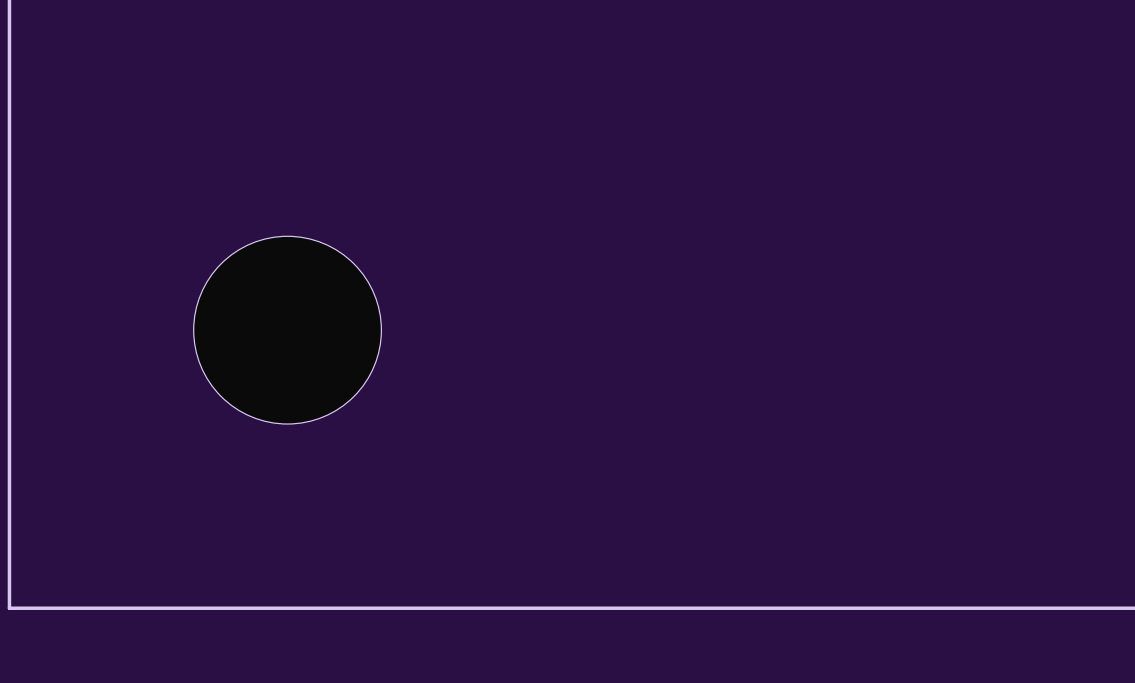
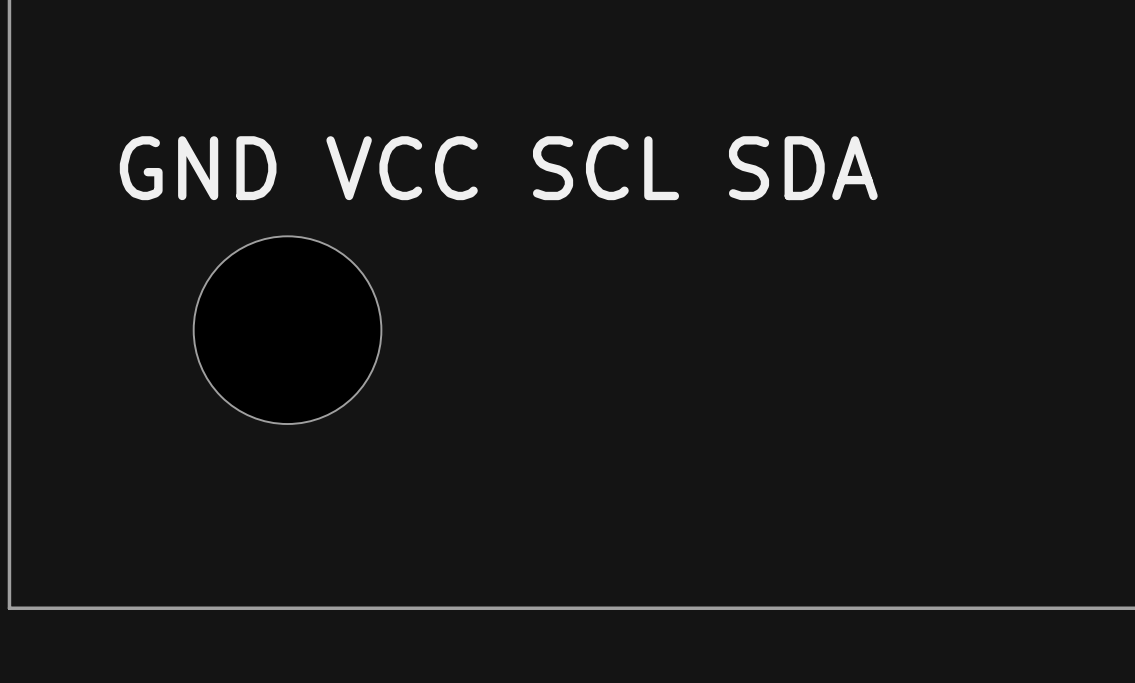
text: none -> GND VCC SCL SDA (498, 168)

